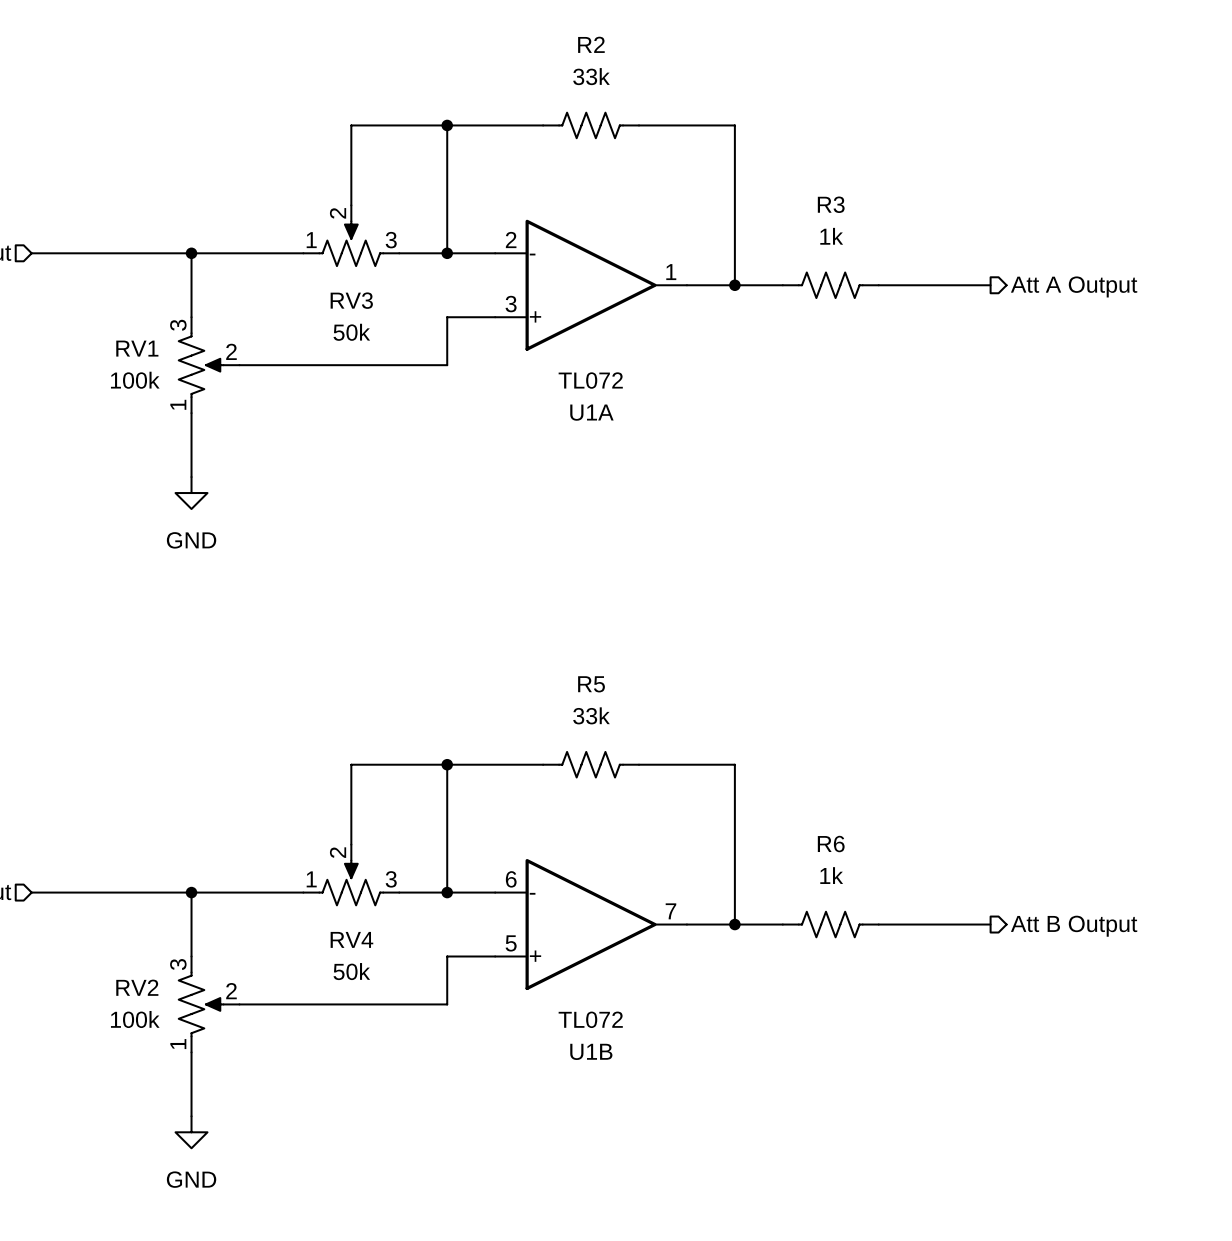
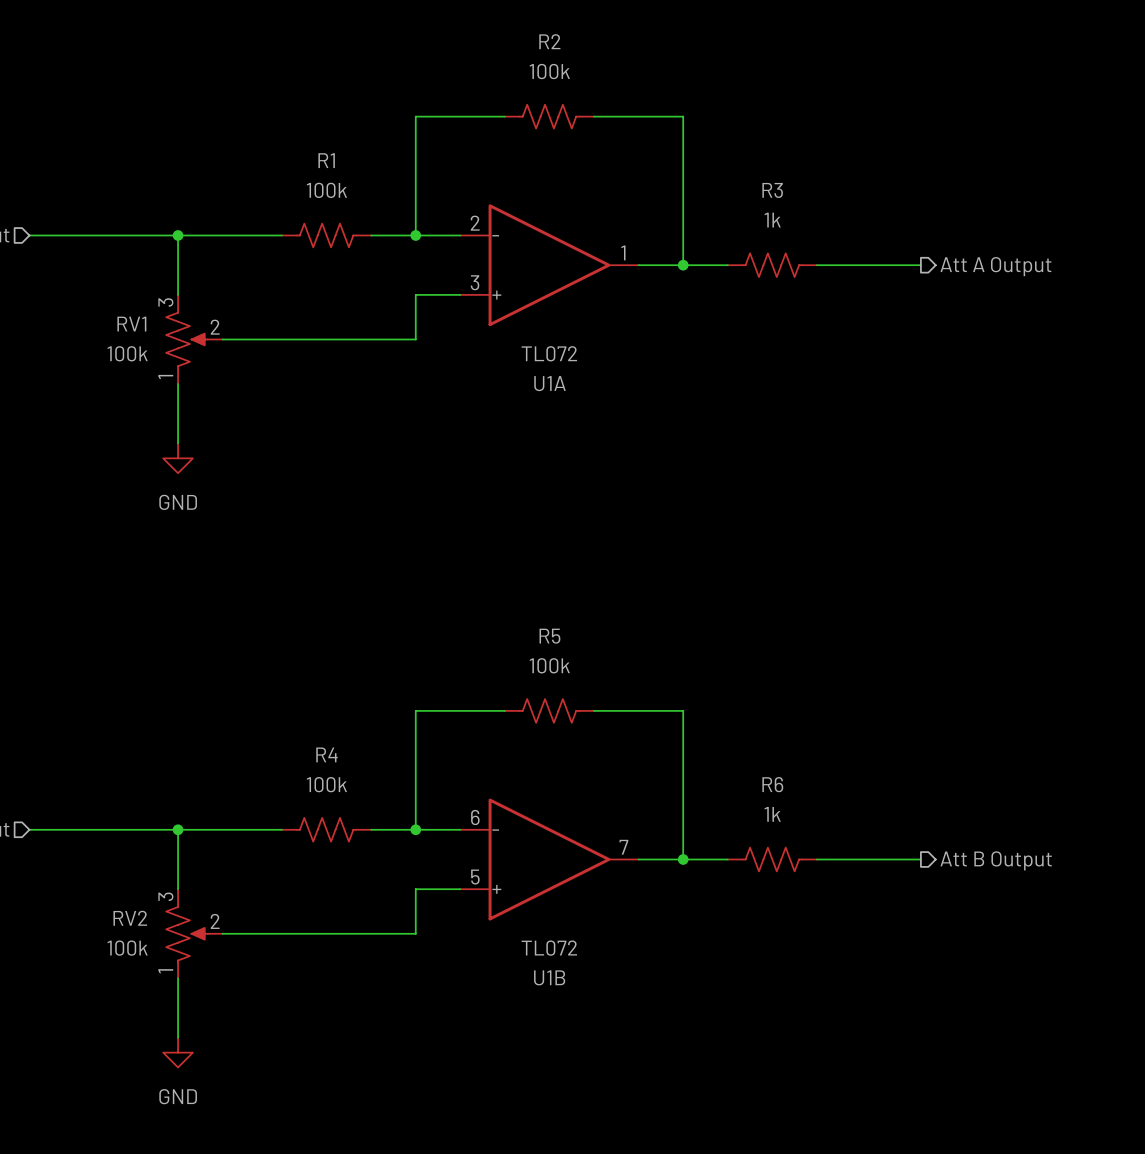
R2 value: 33k (591, 76) -> 100k (549, 71)
wire: (447, 125) (351, 125) (351, 205) -> none
junction: (447, 125) -> none
RV3: 50k (351, 235) -> none
R1: none -> 100k (326, 235)
R5 value: 33k (591, 715) -> 100k (549, 665)
wire: (447, 764) (351, 764) (351, 844) -> none
junction: (447, 764) -> none
RV4: 50k (351, 874) -> none
R4: none -> 100k (326, 829)

